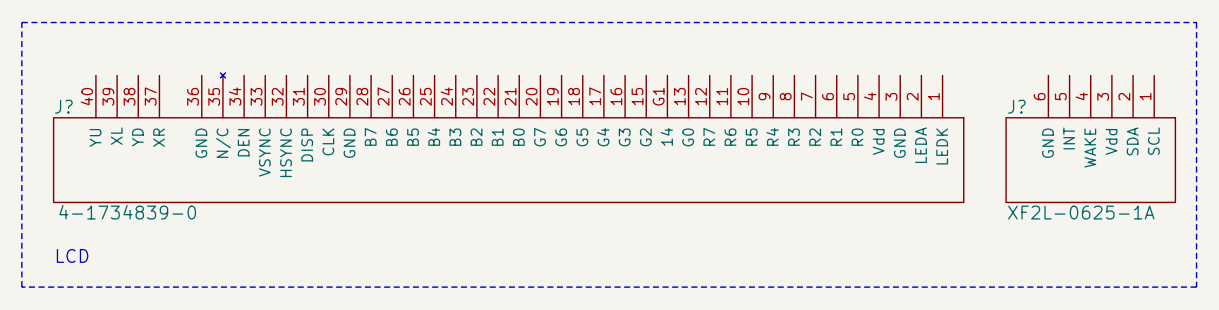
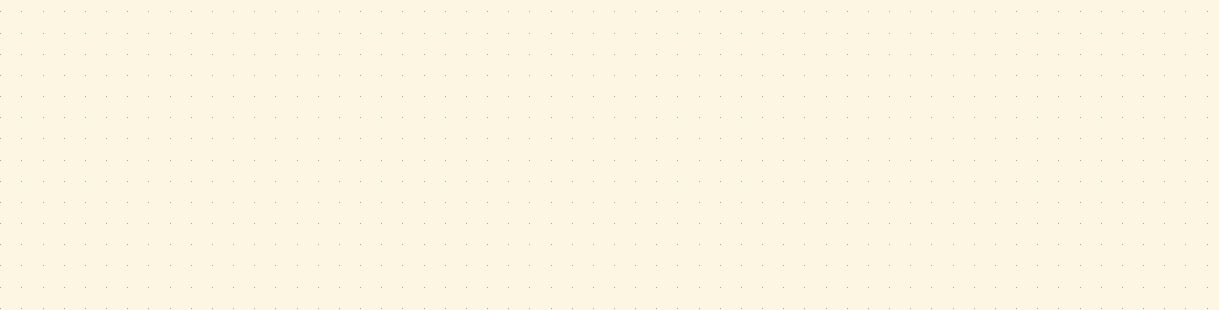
line: (21, 22) (21, 287) (1196, 287) (1196, 22) (21, 22) -> none
J?: 4-1734839-0 (508, 137) -> none
J?: XF2L-0625-1A (1090, 138) -> none
text: LCD (72, 255) -> none

